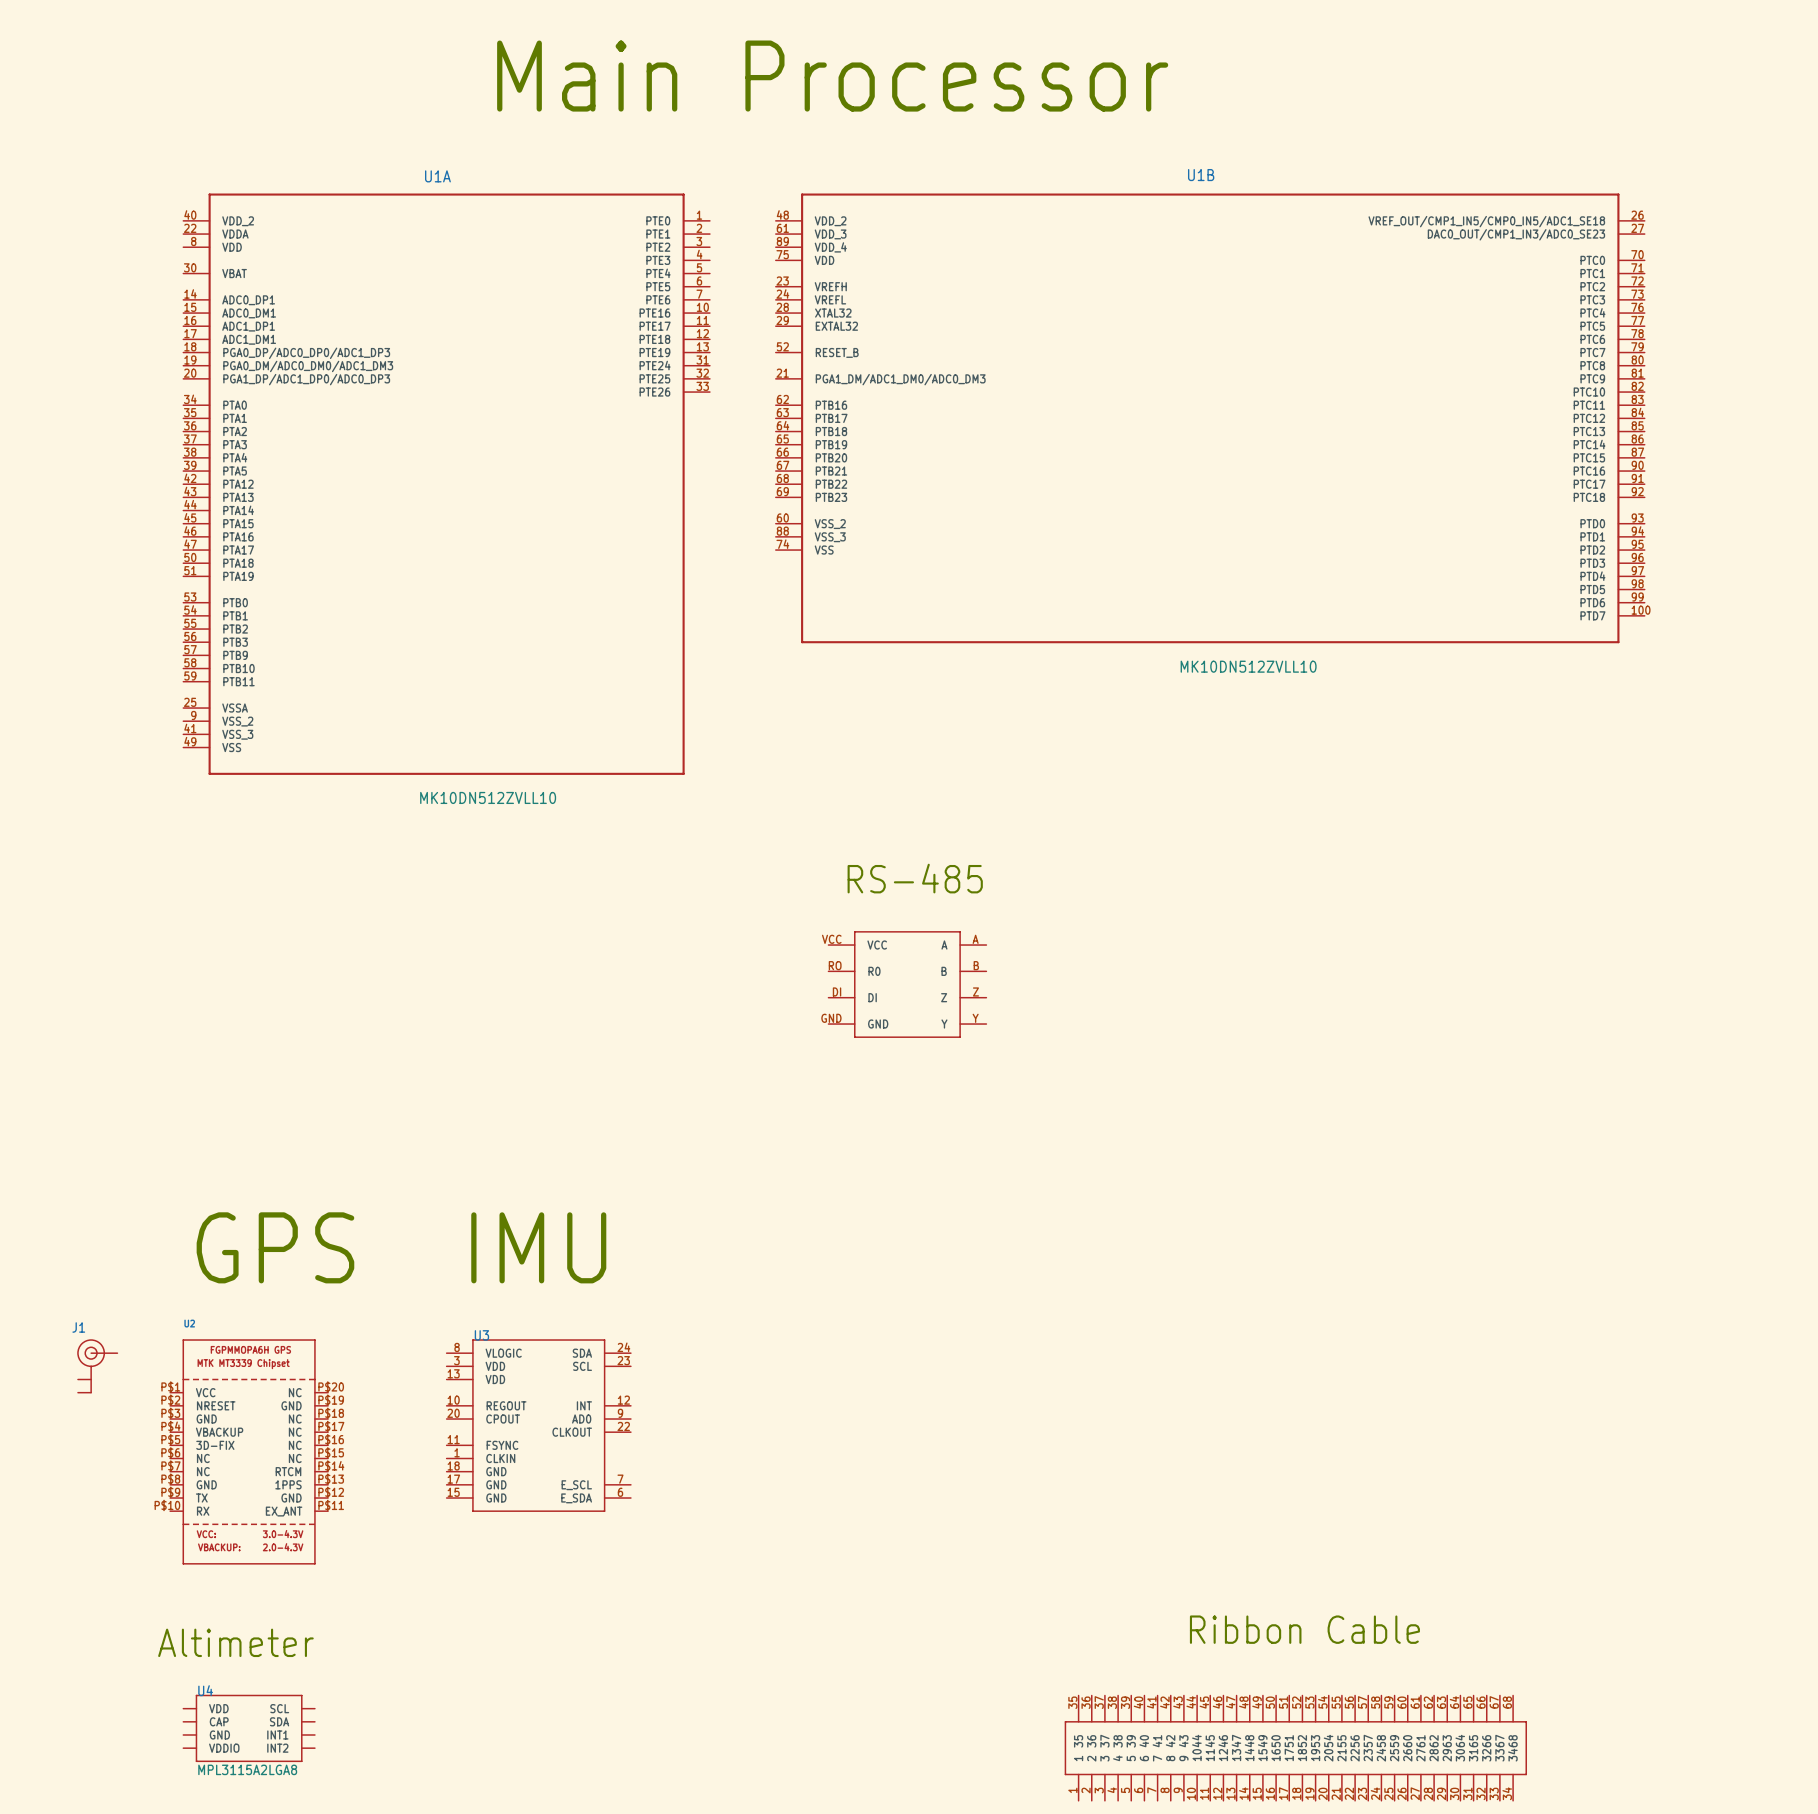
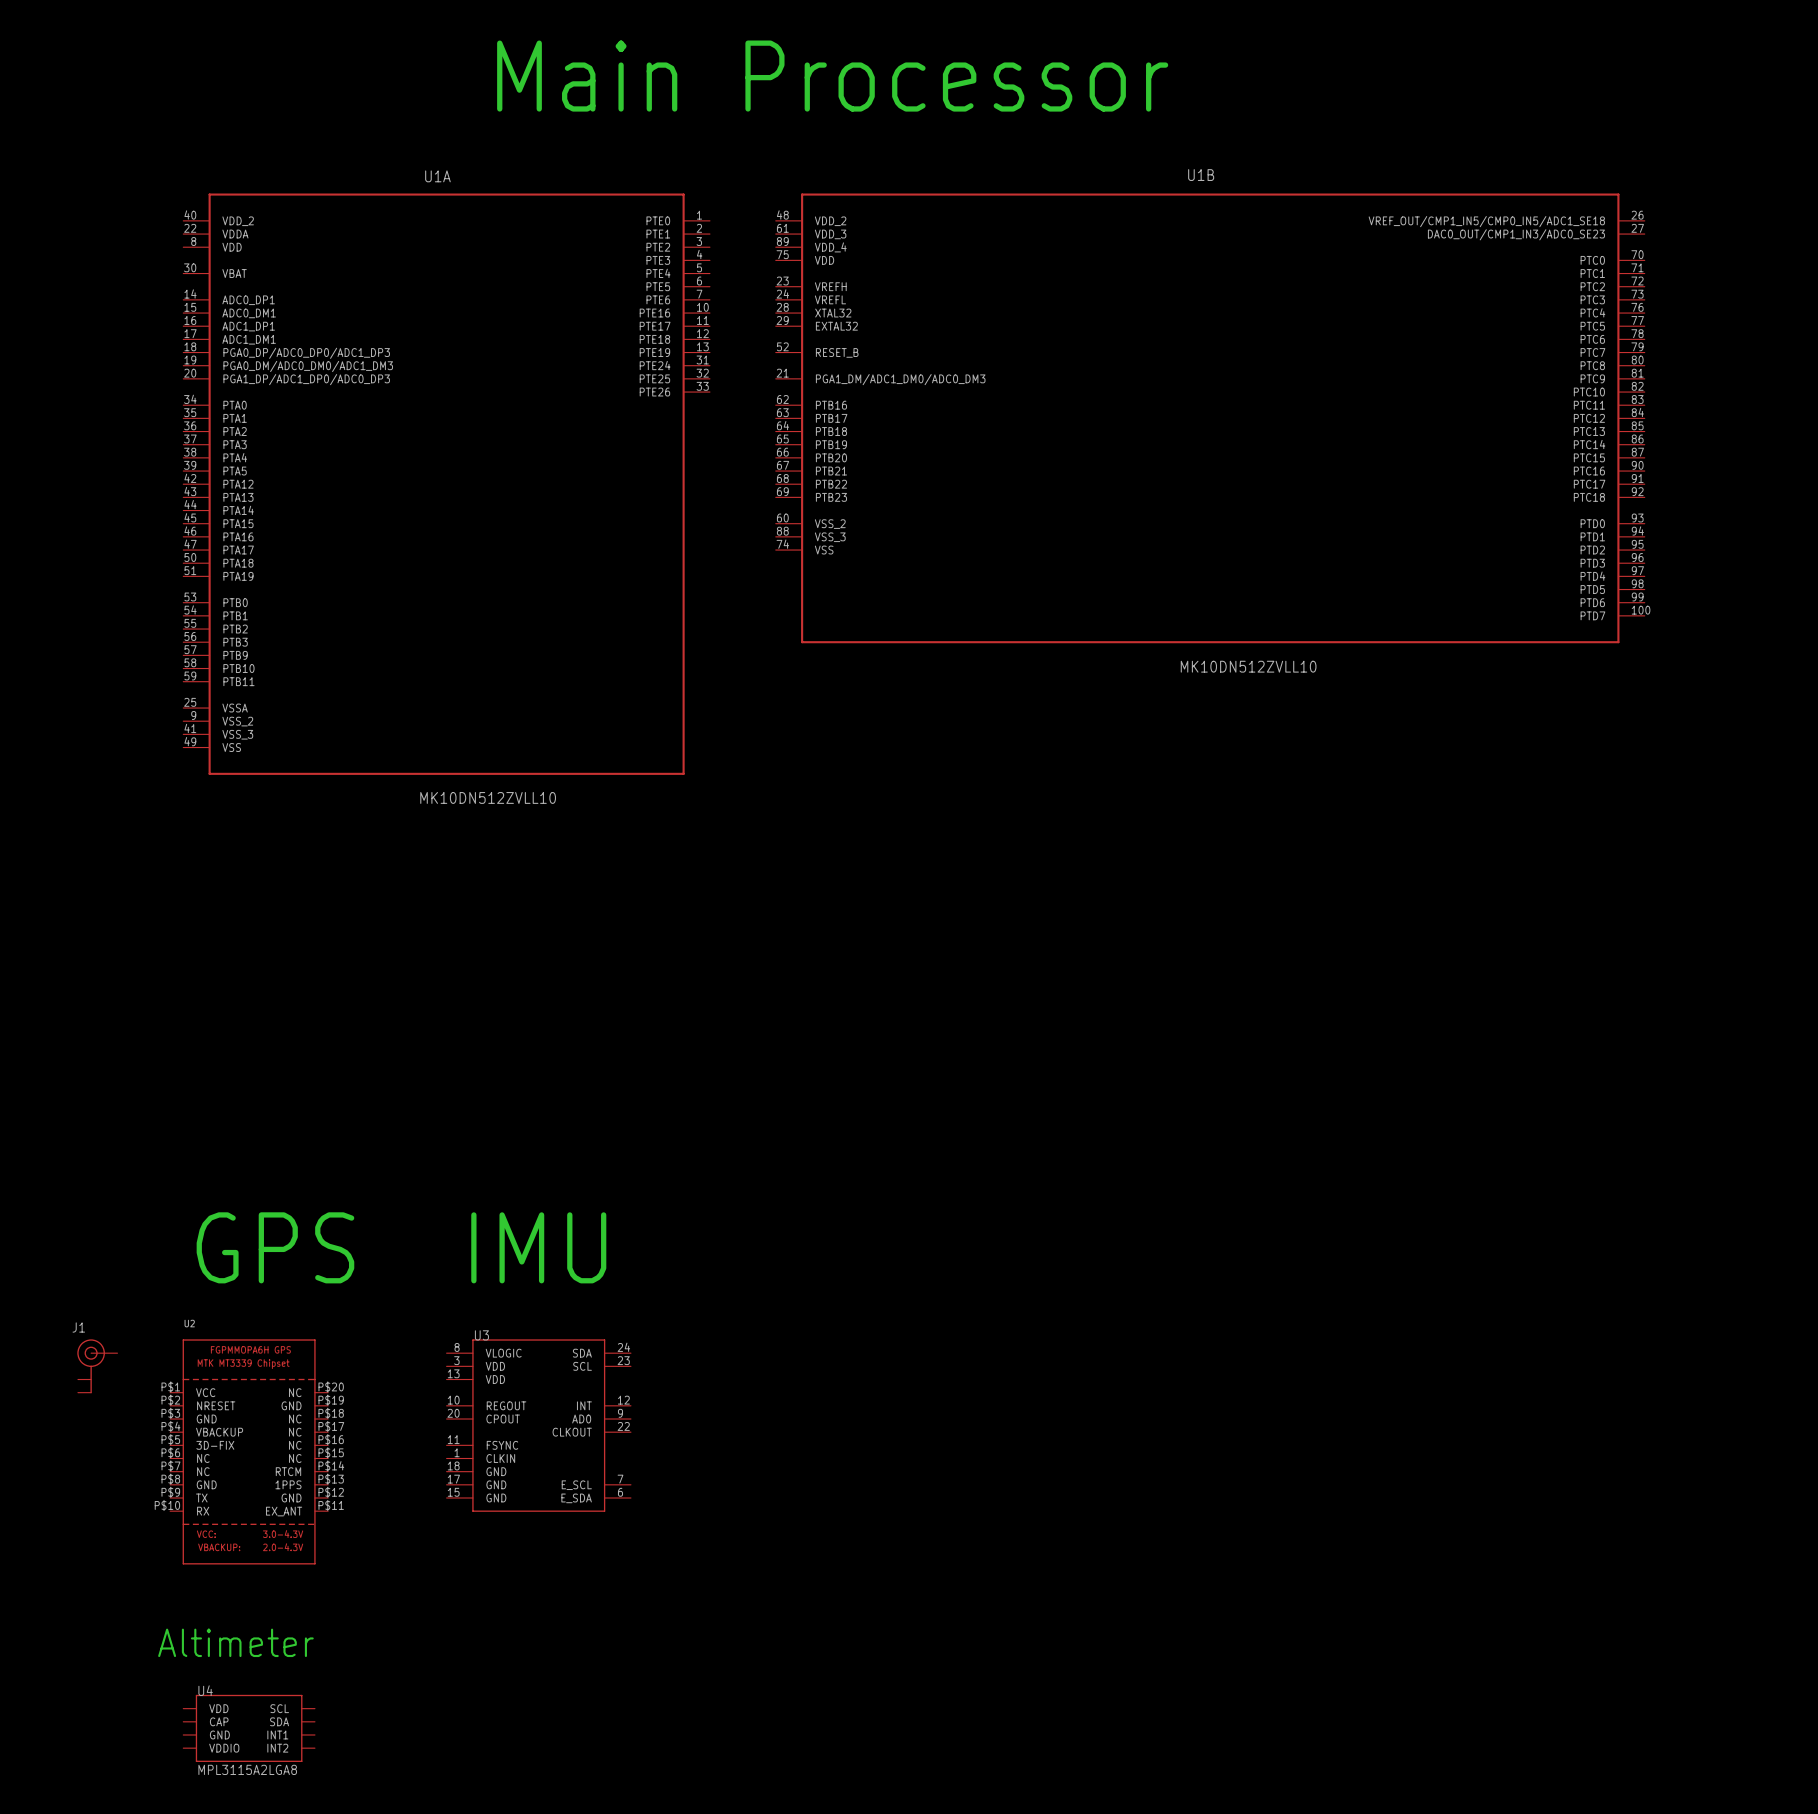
text: RS-485 (915, 878) -> none
part: (907, 984) -> none
text: Ribbon Cable (1304, 1629) -> none
part: (1295, 1748) -> none

